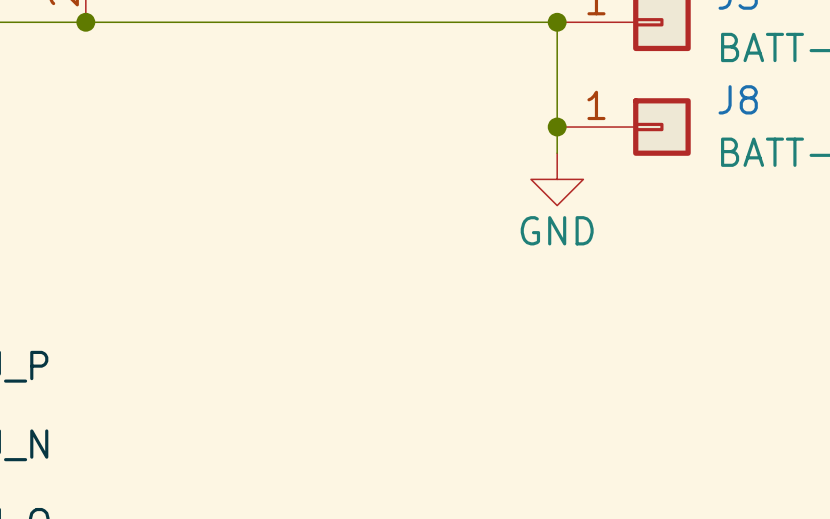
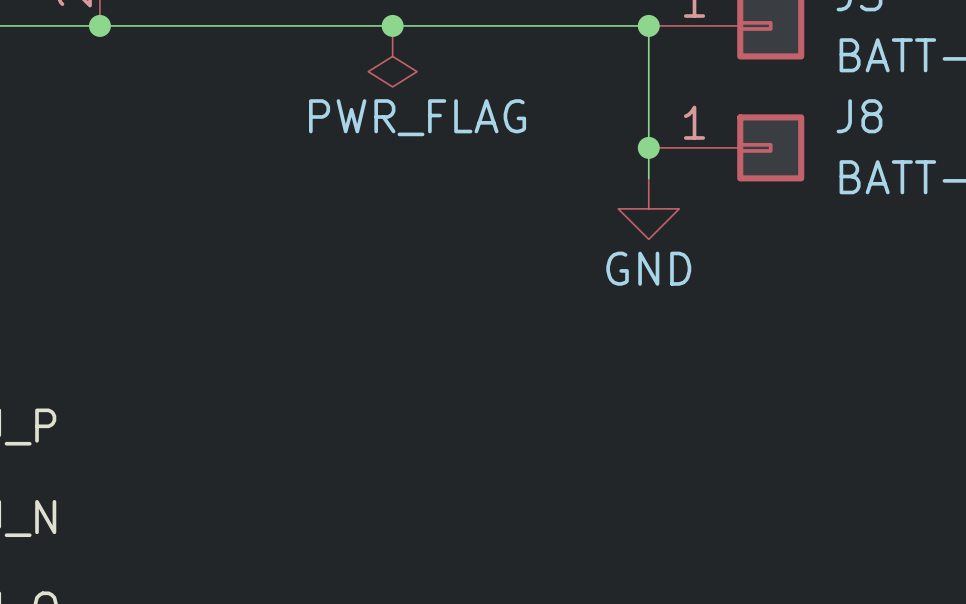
junction: none -> (392, 25)
power symbol: none -> PWR_FLAG (392, 56)

